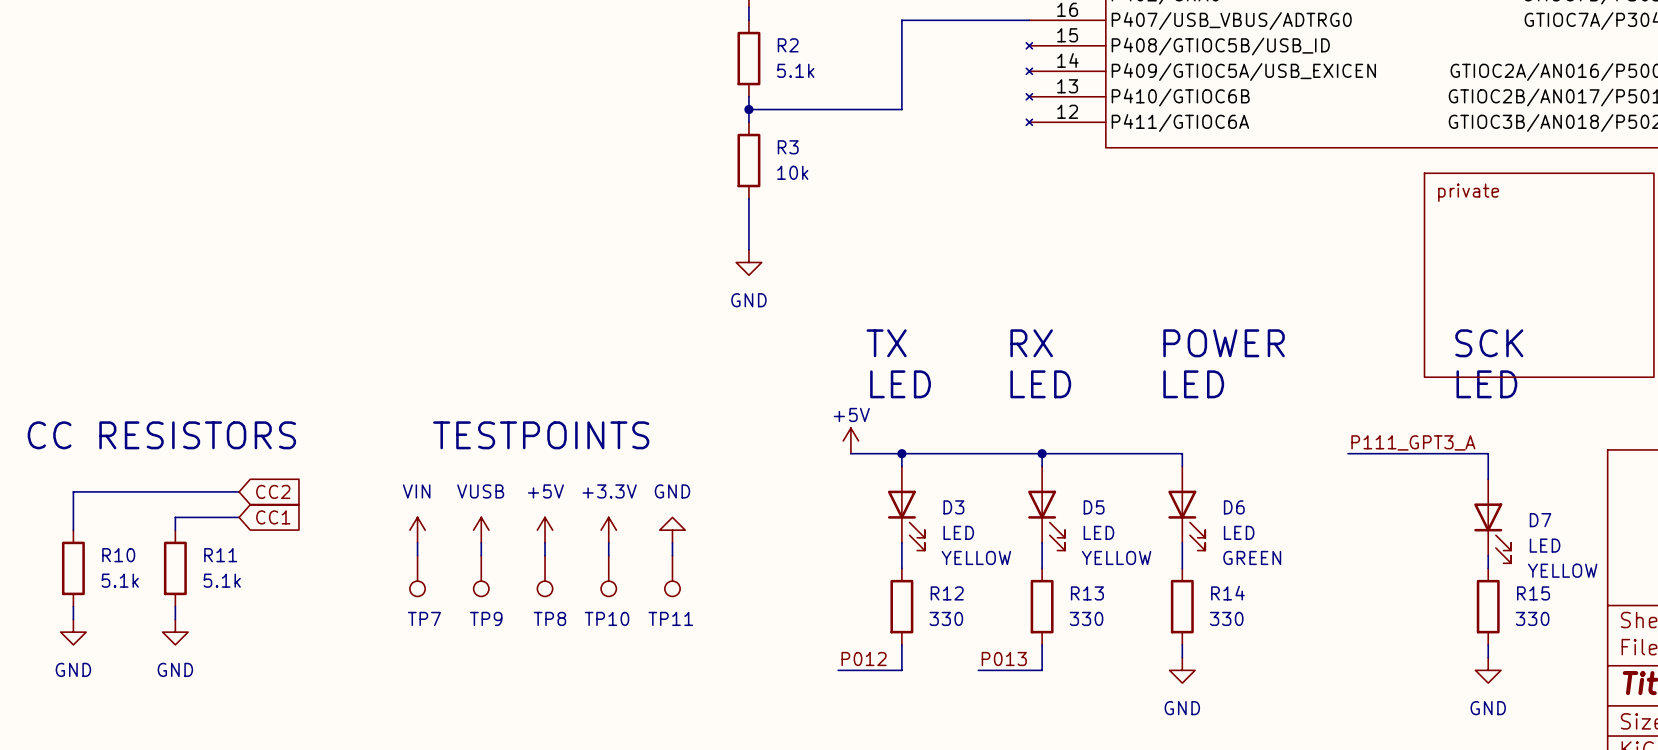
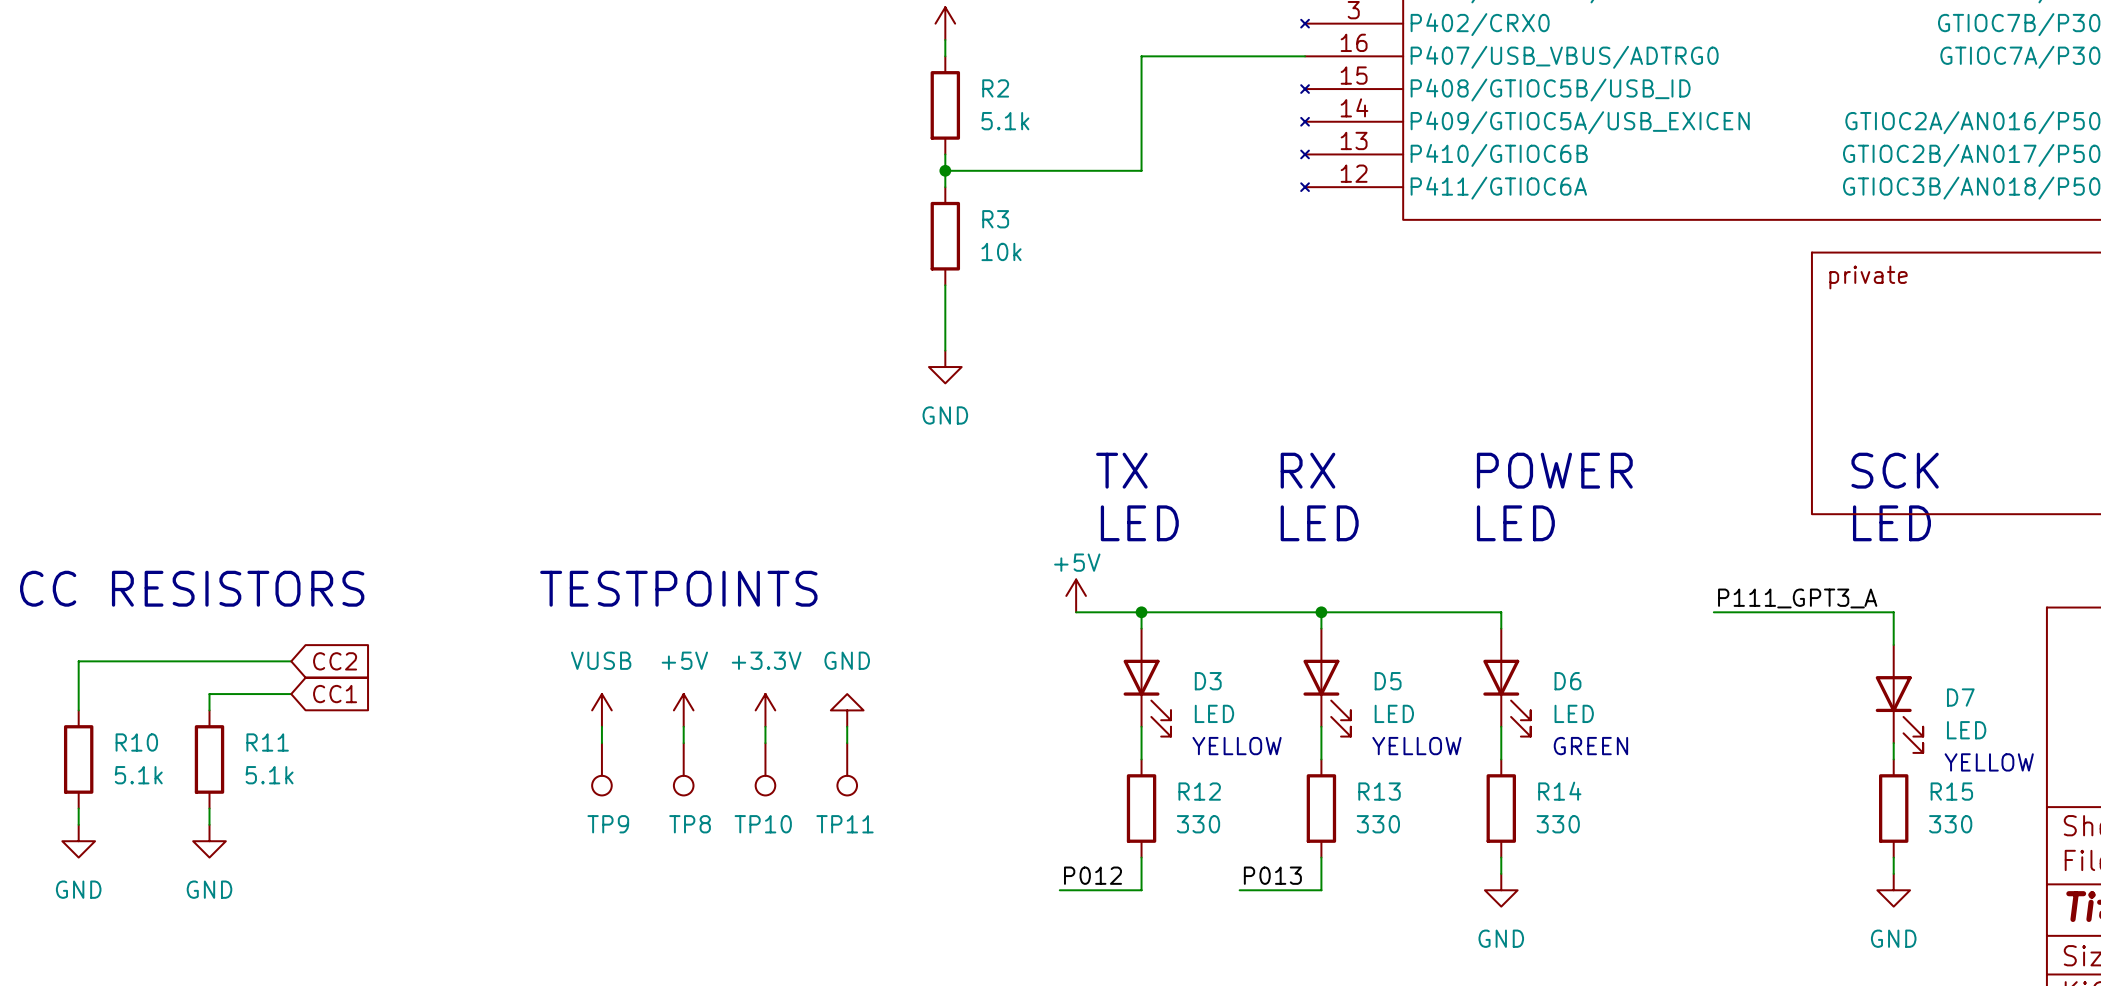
power symbol: VIN (417, 530) -> none
wire: (417, 542) (417, 555) -> none
TP7: (417, 576) -> none

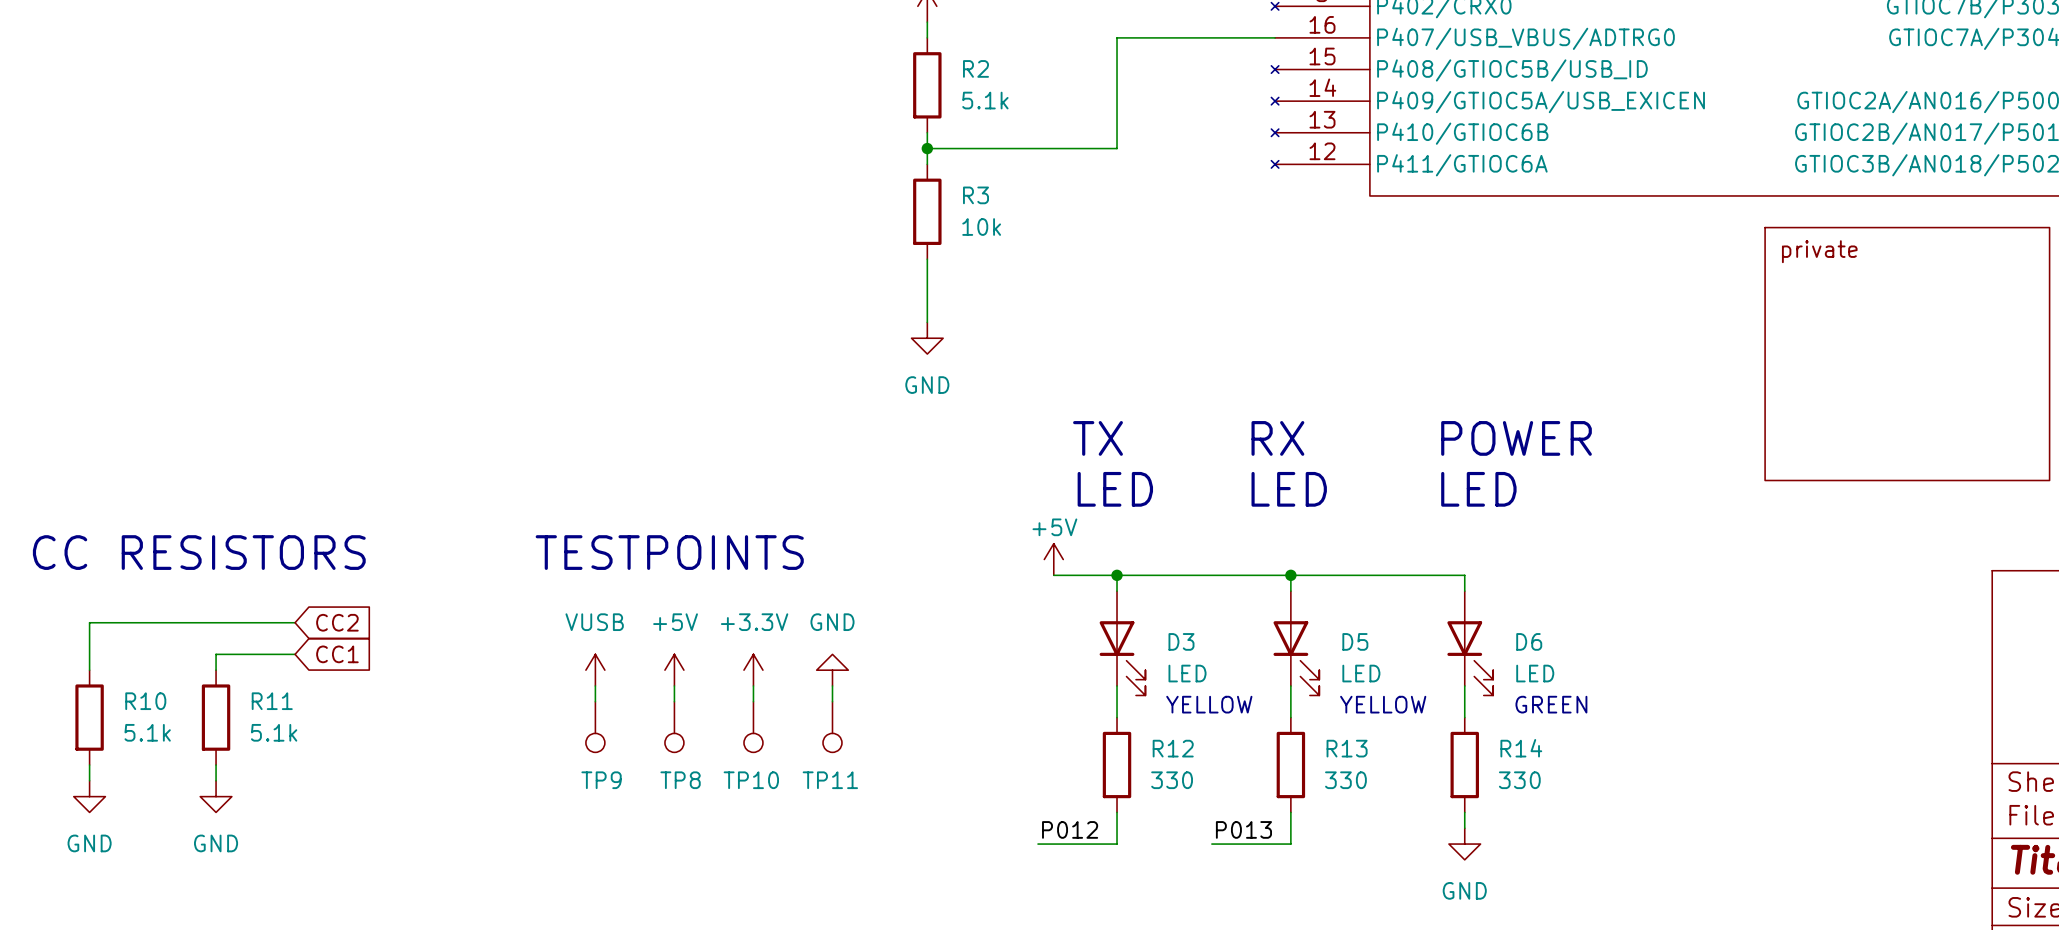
text: SCK (1895, 470) -> none
text: LED (1891, 523) -> none
label: P111_GPT3_A (1797, 598) -> none
wire: (1713, 612) (1893, 612) (1893, 645) -> none
D7: LED (1899, 698) -> none
wire: (1893, 743) (1893, 759) -> none
text: YELLOW (1989, 762) -> none
R15: 330 (1893, 808) -> none
wire: (1893, 857) (1893, 873) -> none
power symbol: GND (1893, 890) -> none

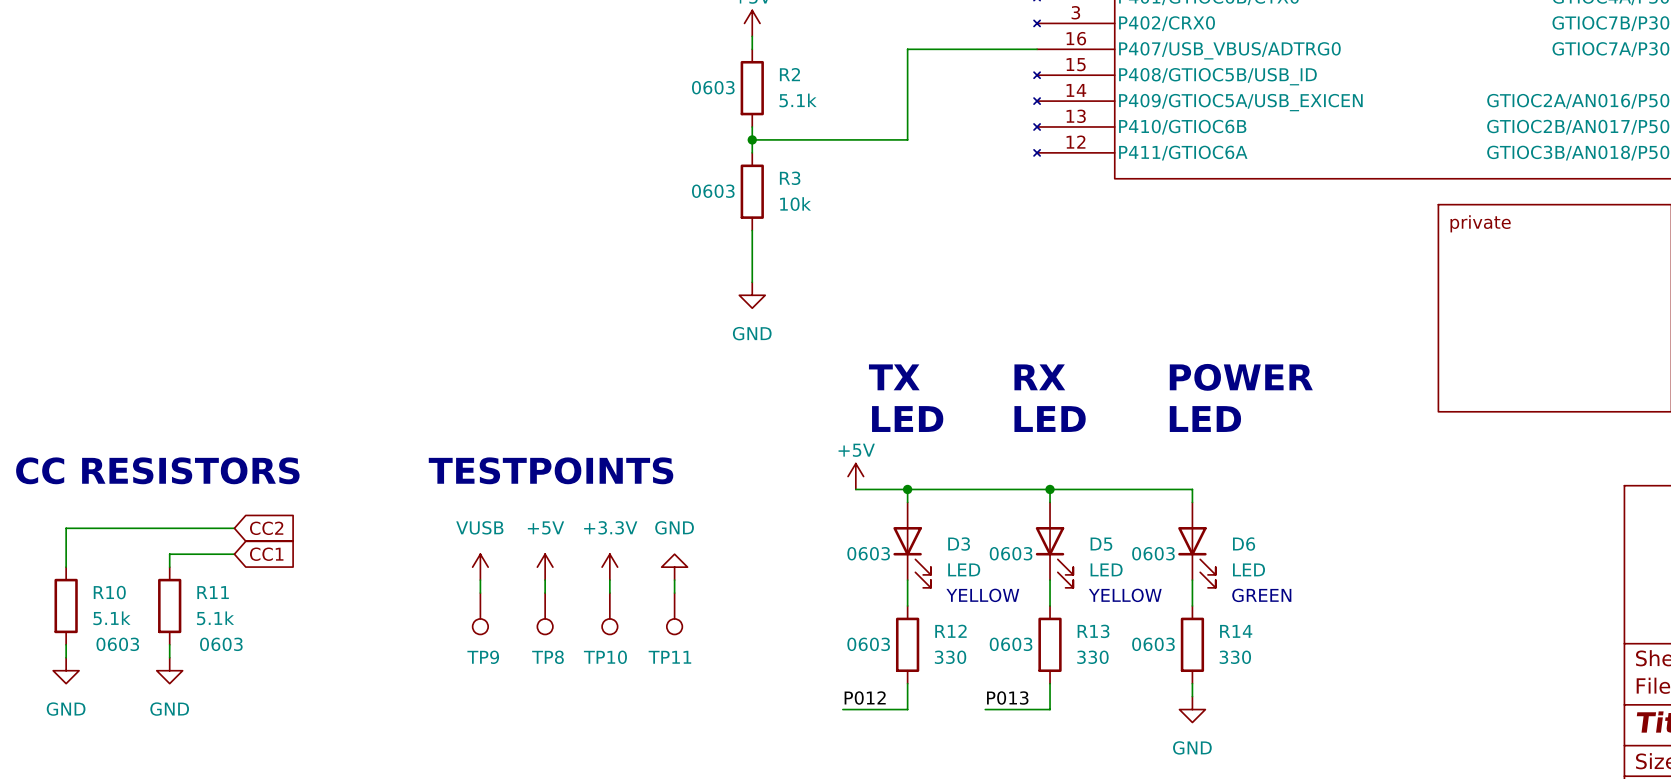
R2 text: none -> 0603 (713, 87)
R3 text: none -> 0603 (713, 191)
D3 text: none -> 0603 (868, 553)
D5 text: none -> 0603 (1011, 553)
D6 text: none -> 0603 (1153, 553)
R10 text: none -> 0603 (117, 644)
R11 text: none -> 0603 (221, 644)
R12 text: none -> 0603 (868, 644)
R13 text: none -> 0603 (1011, 644)
R14 text: none -> 0603 (1153, 644)

